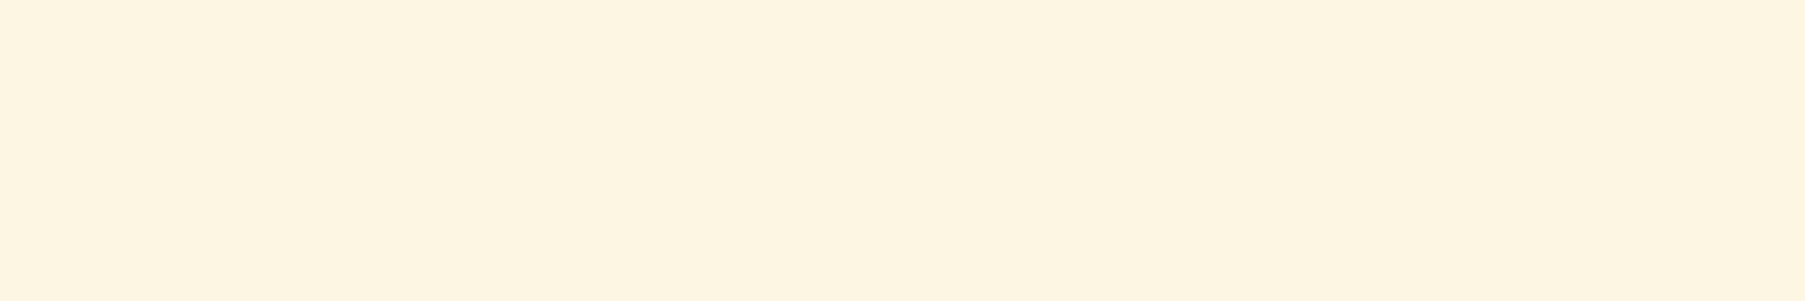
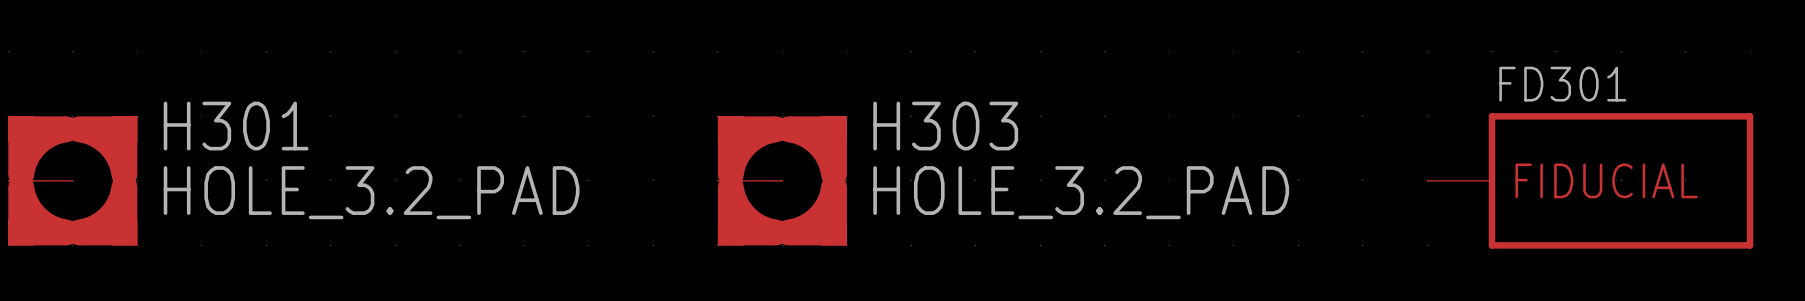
H301: none -> HOLE_3.2_PAD (72, 180)
H303: none -> HOLE_3.2_PAD (782, 180)
FD301: none -> (1590, 180)

